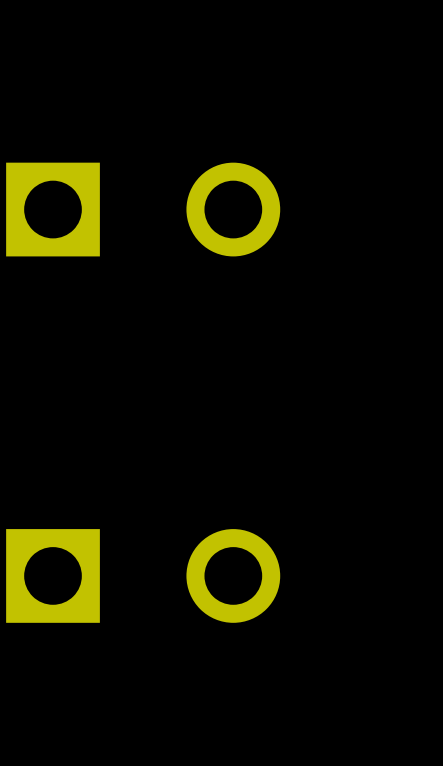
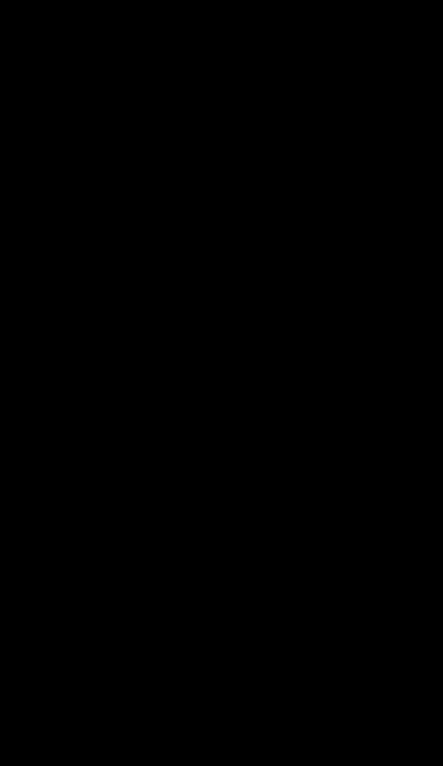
part: (143, 209) -> none
part: (143, 575) -> none

